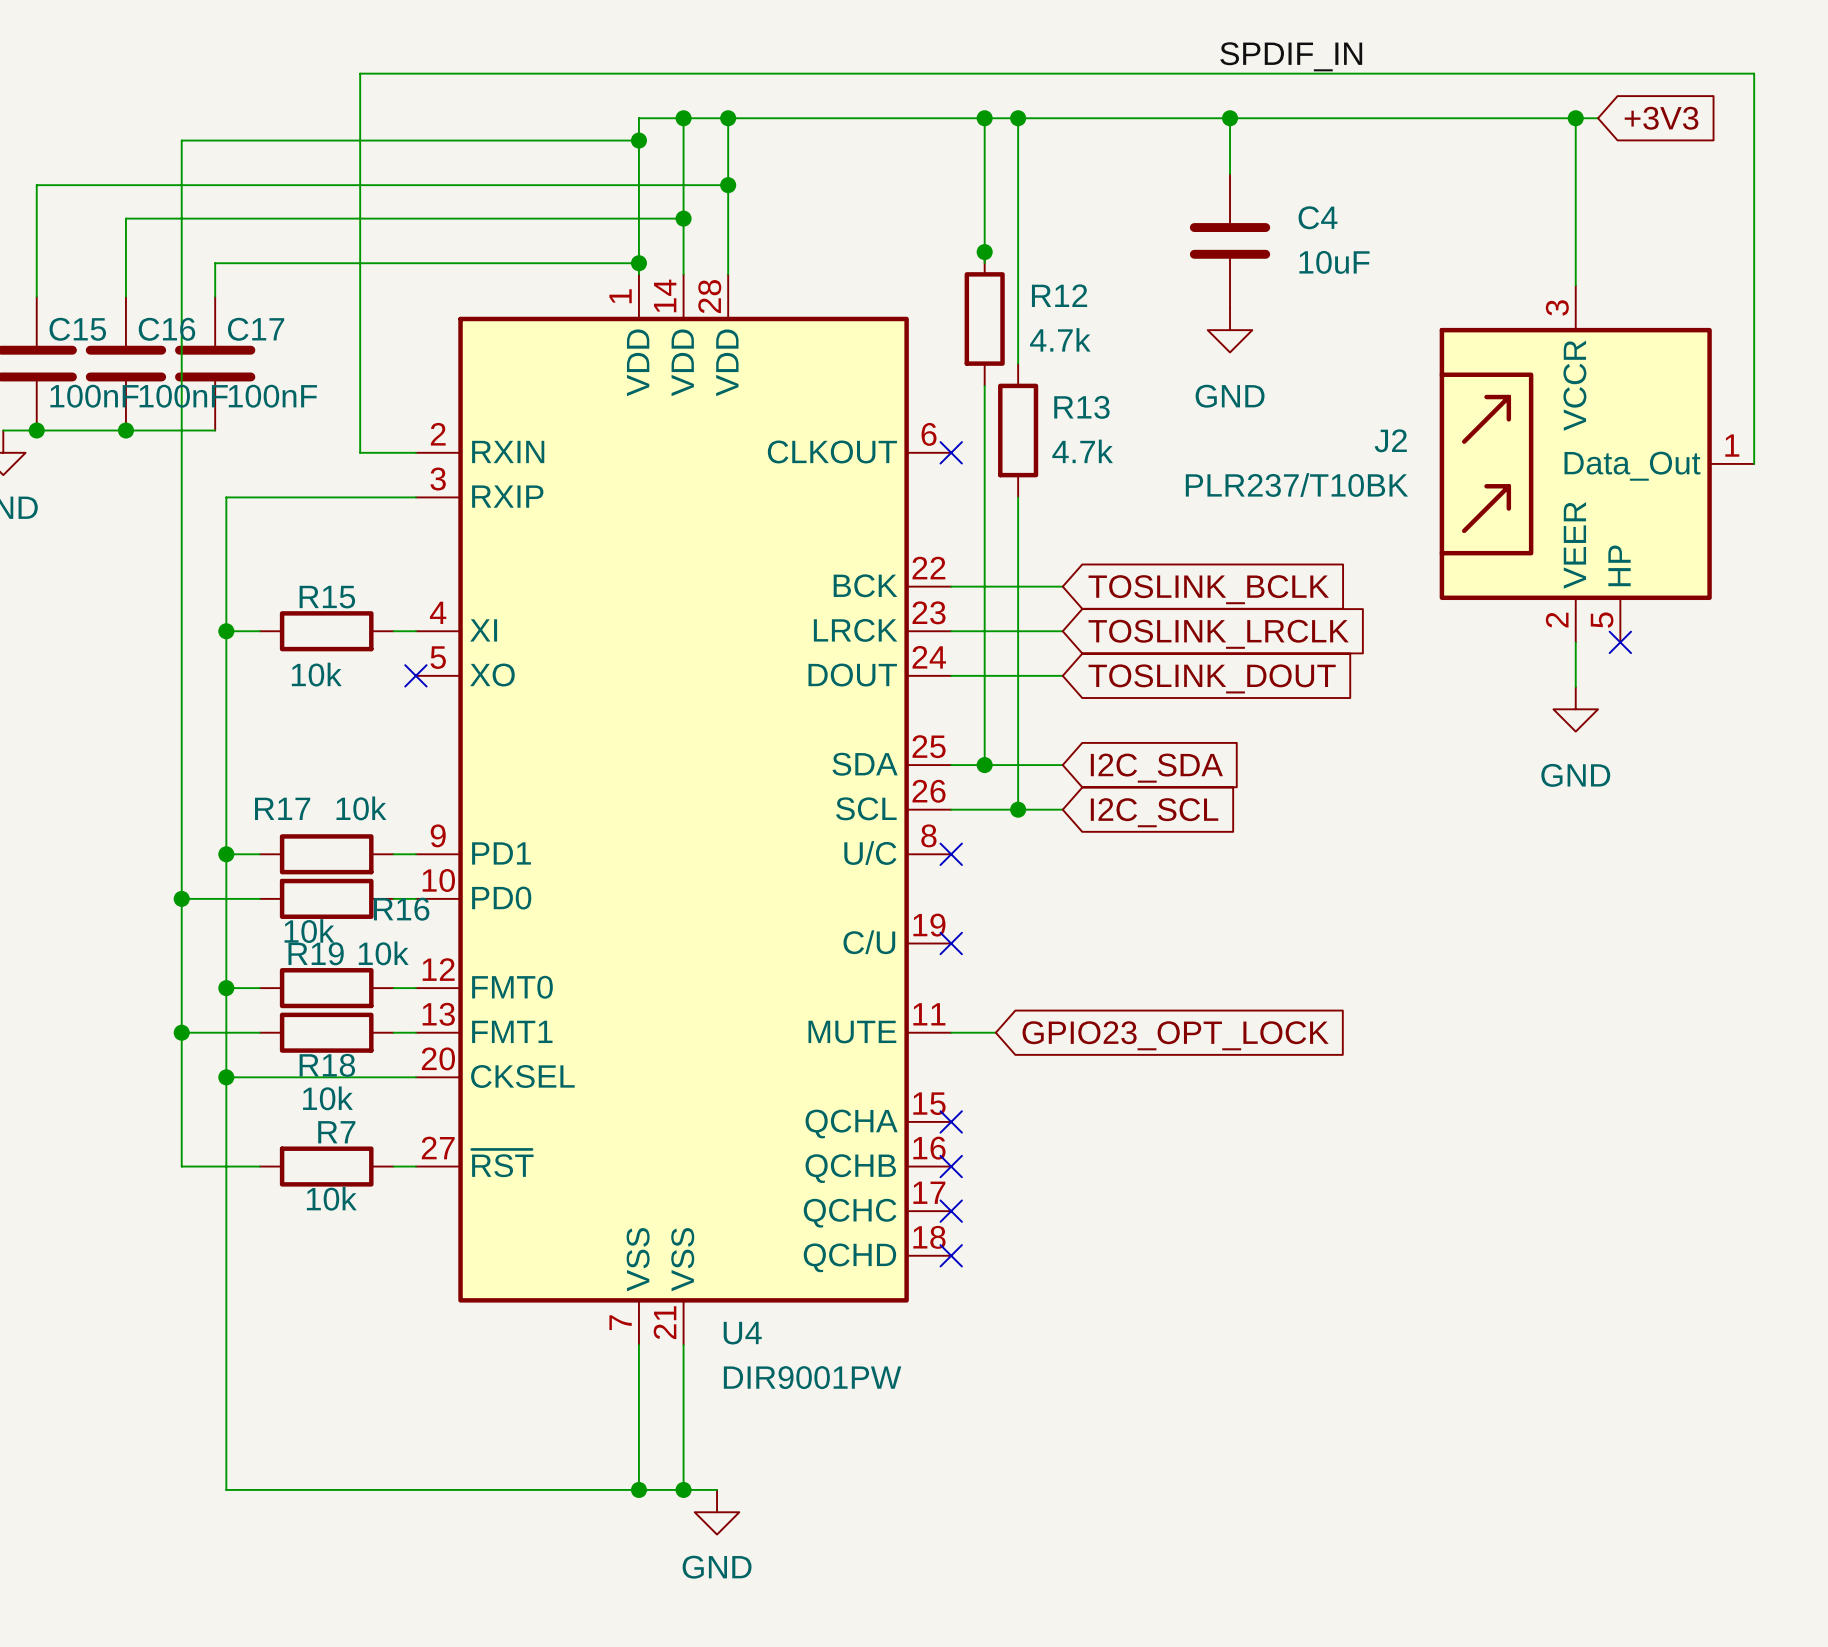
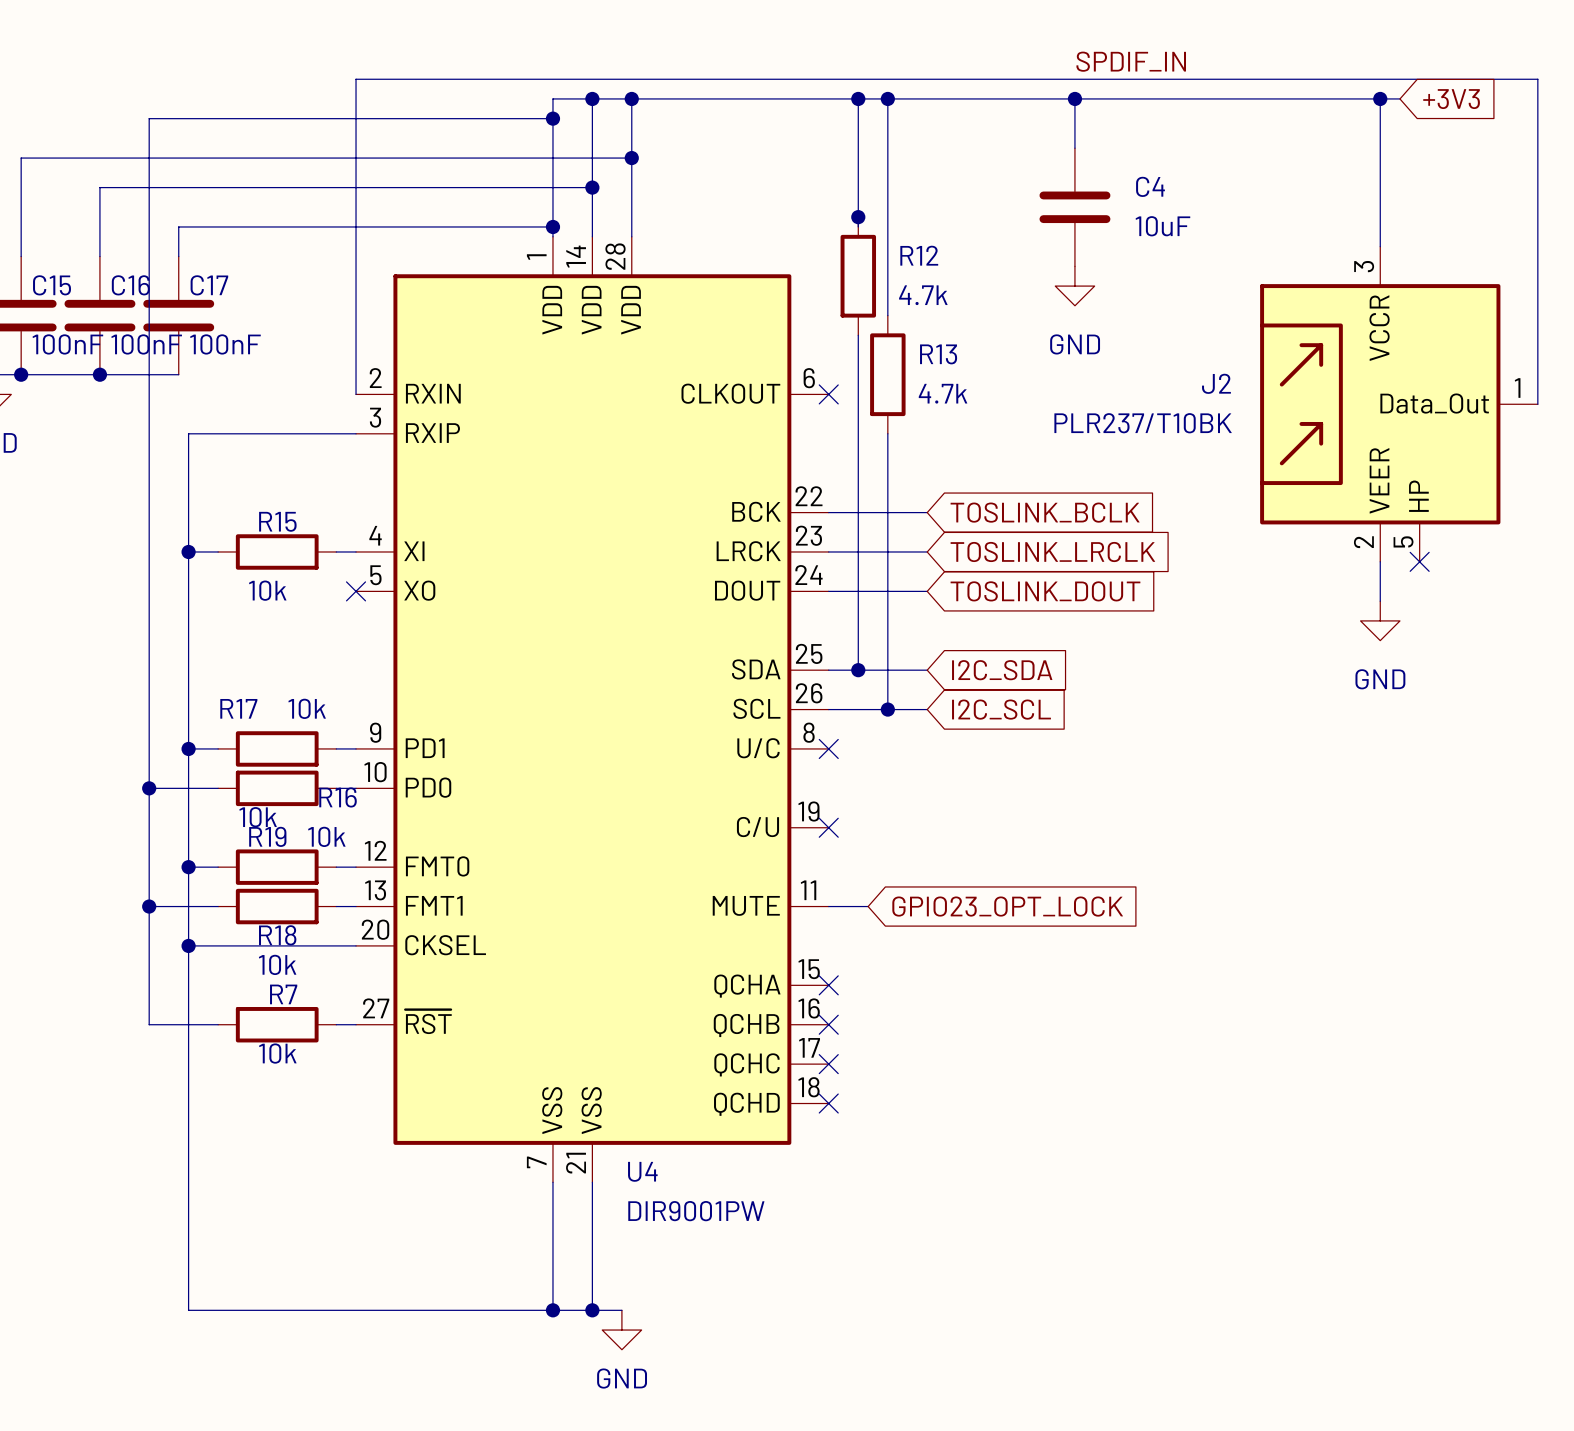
label position: SPDIF_IN (1291, 56) -> SPDIF_IN (1131, 61)
wire: (1754, 95) (1754, 73) (360, 73) (360, 452) (415, 452) -> (1537, 79) (356, 79) (356, 394)

